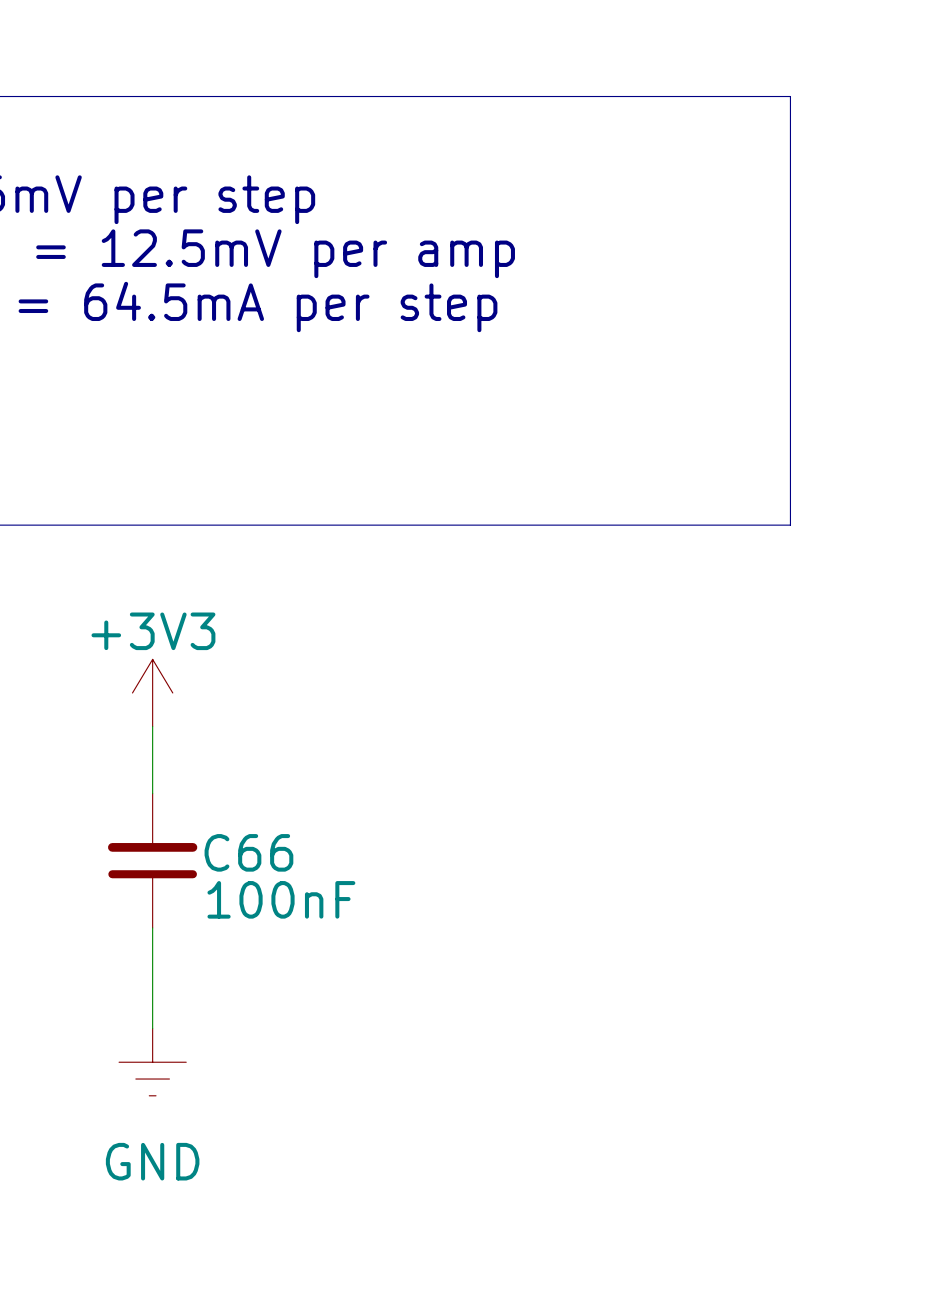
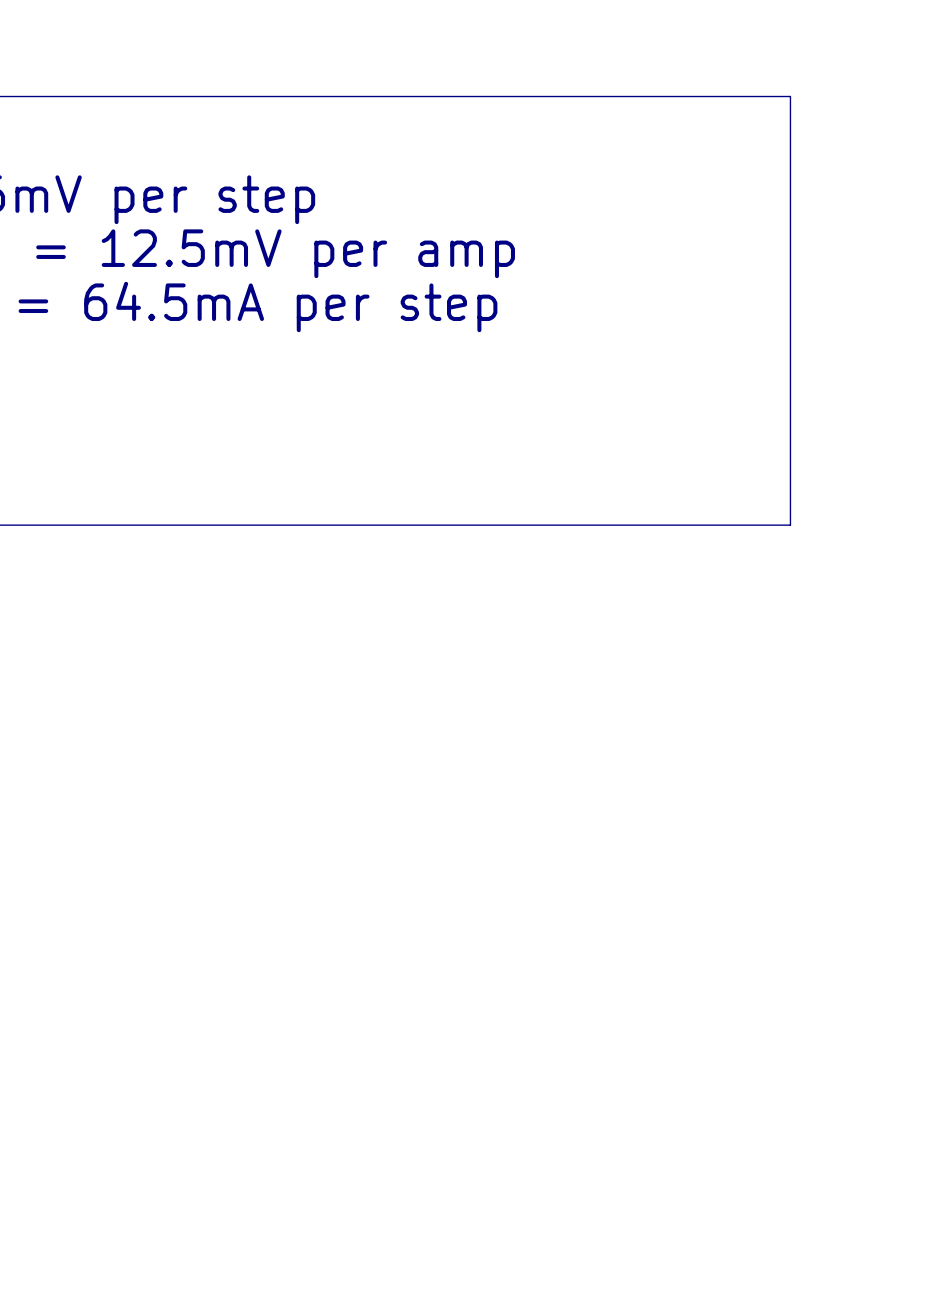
power symbol: +3V3 (152, 692) -> none
wire: (152, 726) (152, 793) -> none
C66: 100nF (152, 860) -> none
wire: (152, 927) (152, 1028) -> none
power symbol: GND (152, 1062) -> none

